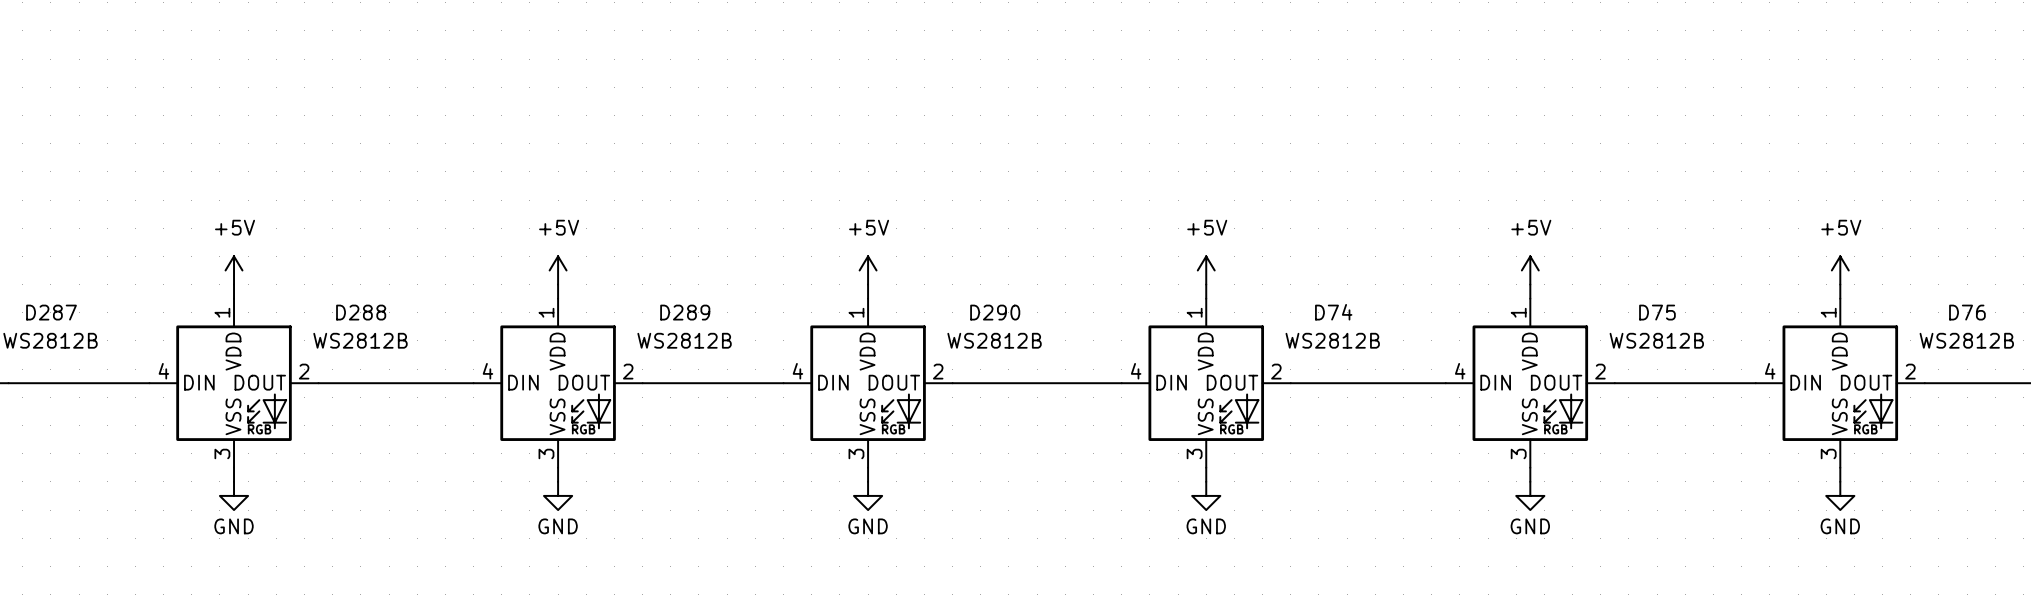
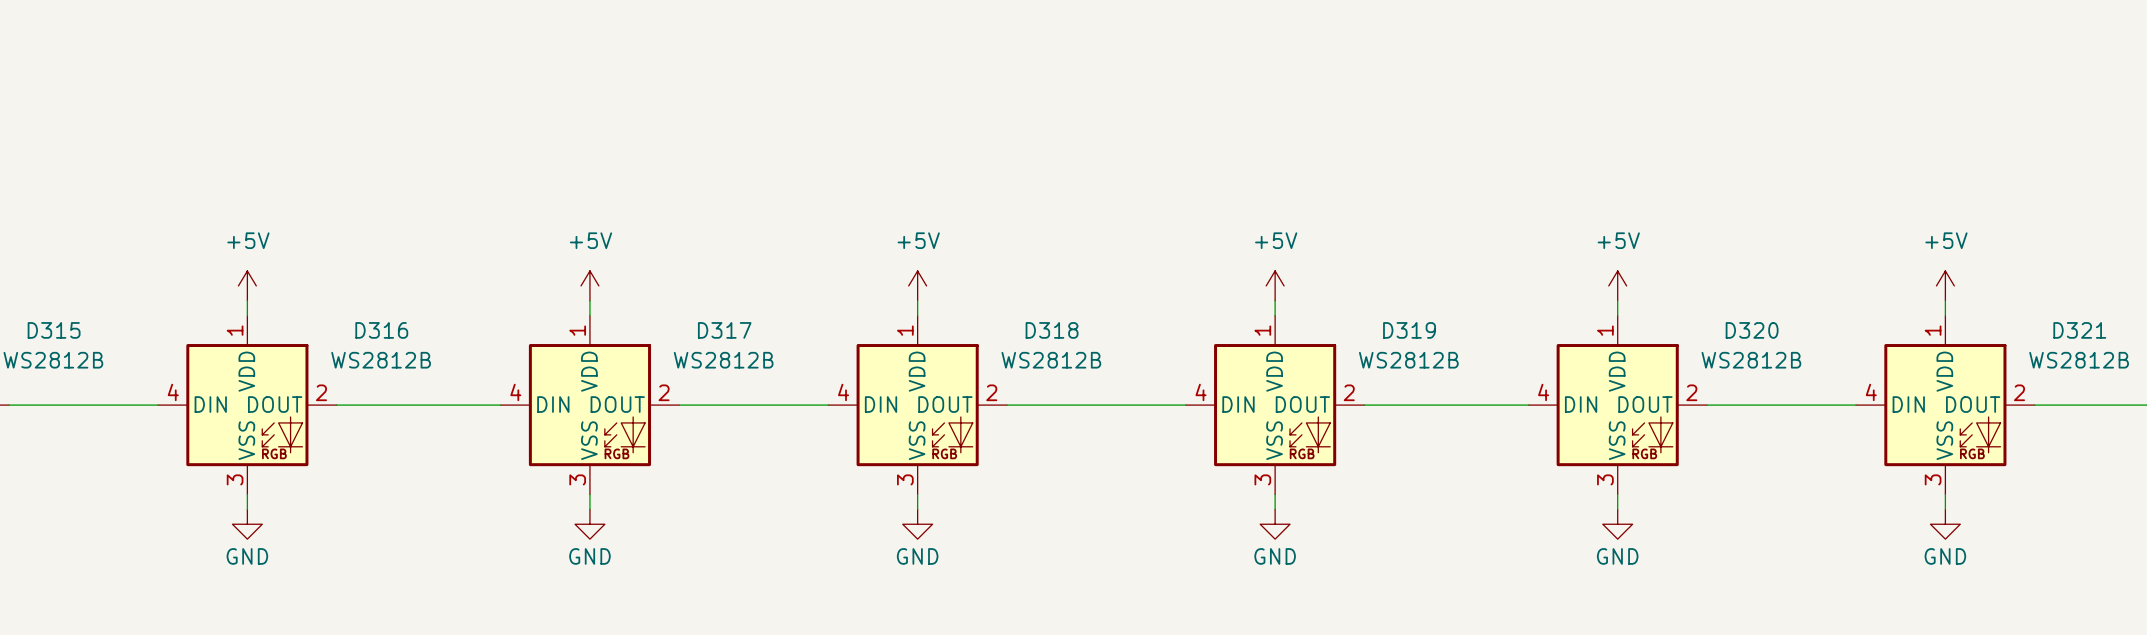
D287 name: D287 (51, 312) -> D315 (54, 330)
D288 name: D288 (361, 312) -> D316 (381, 330)
D289 name: D289 (685, 312) -> D317 (724, 330)
D290 name: D290 (995, 312) -> D318 (1052, 330)
D74 name: D74 (1333, 312) -> D319 (1409, 330)
D75 name: D75 (1657, 312) -> D320 (1752, 330)
D76 name: D76 (1967, 312) -> D321 (2079, 330)

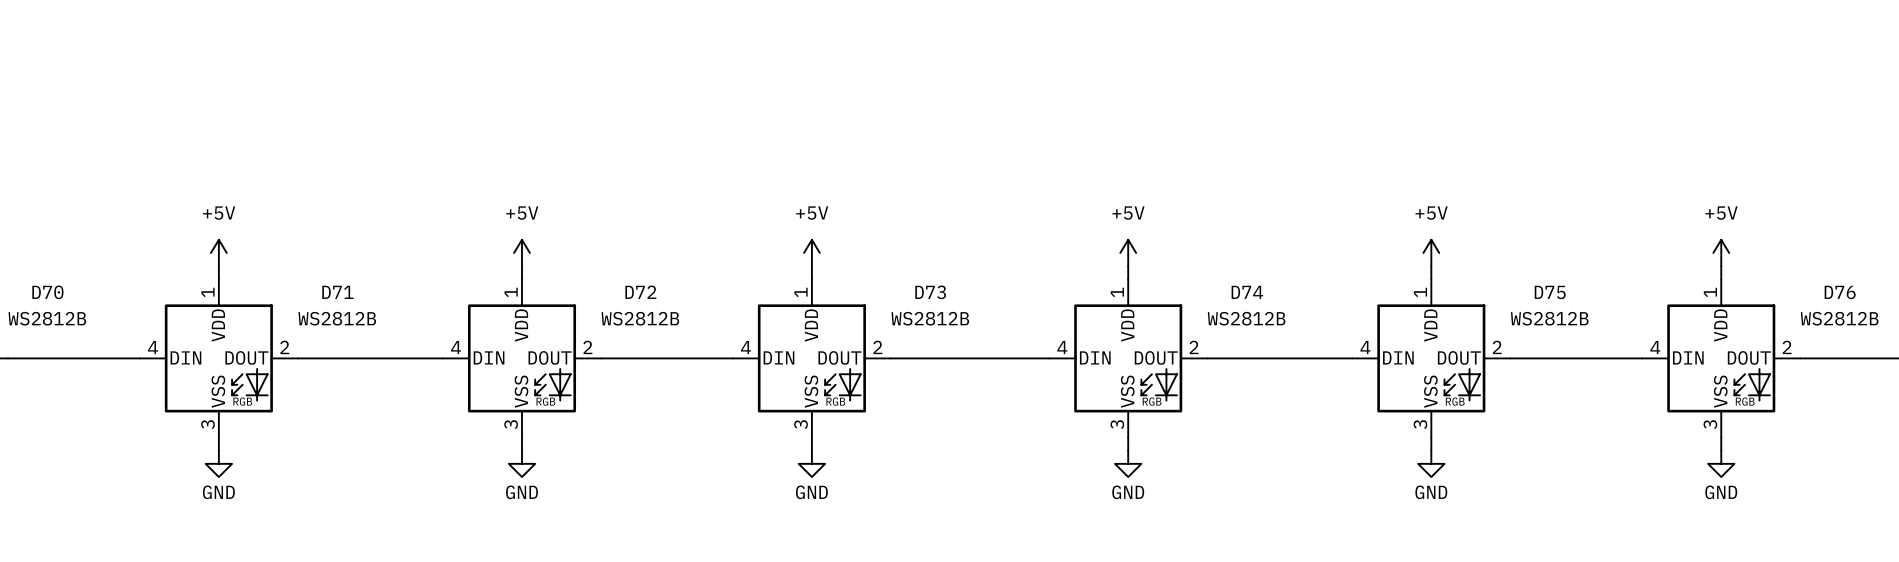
D315 name: D315 (54, 330) -> D70 (47, 292)
D316 name: D316 (381, 330) -> D71 (337, 292)
D317 name: D317 (724, 330) -> D72 (640, 292)
D318 name: D318 (1052, 330) -> D73 (930, 292)
D319 name: D319 (1409, 330) -> D74 (1247, 292)
D320 name: D320 (1752, 330) -> D75 (1550, 292)
D321 name: D321 (2079, 330) -> D76 (1840, 292)

